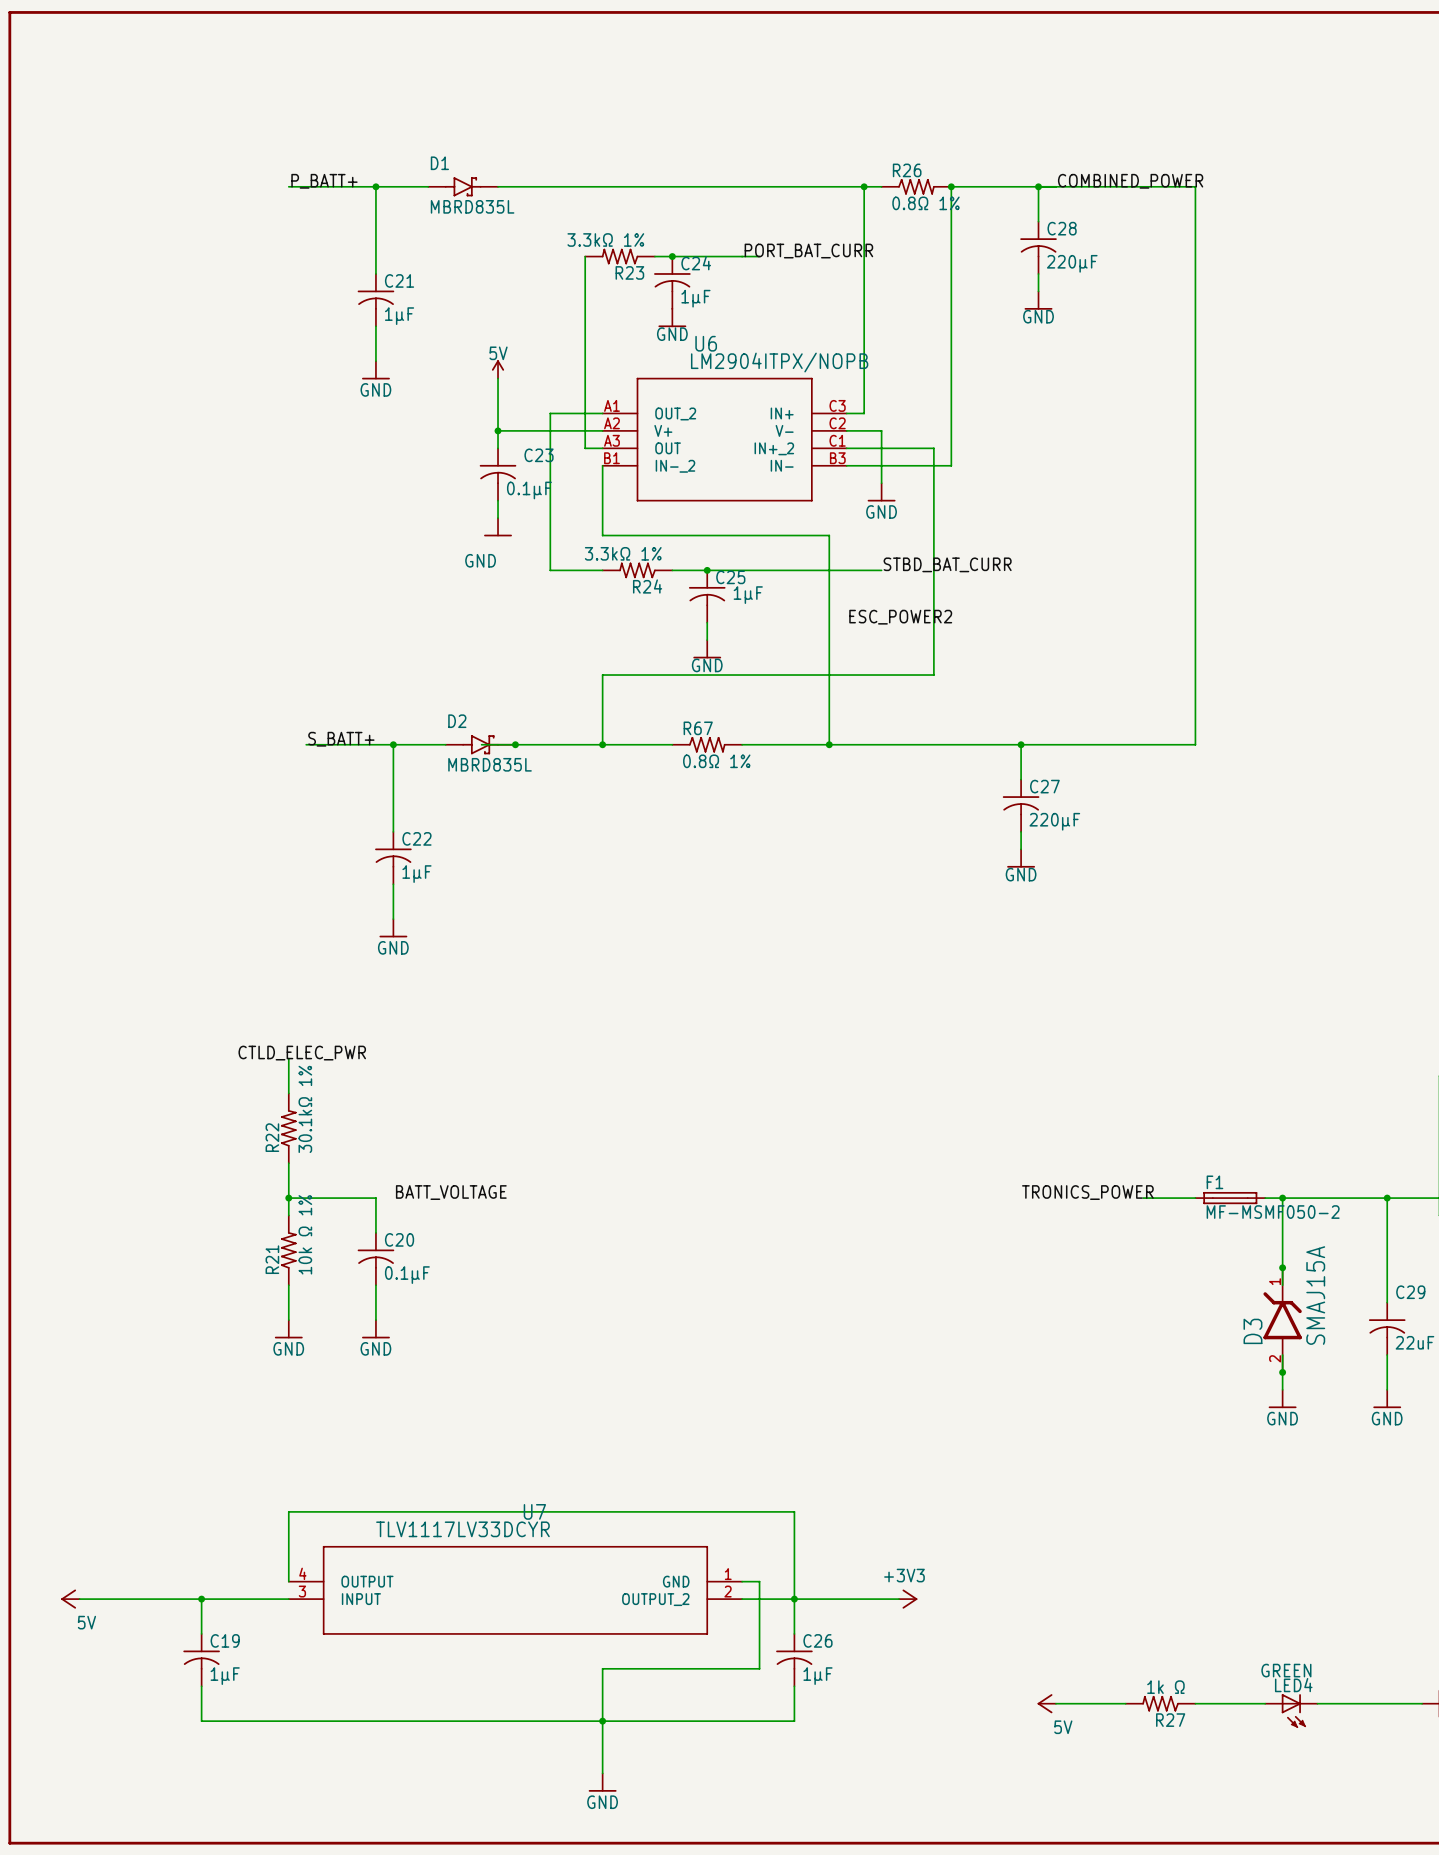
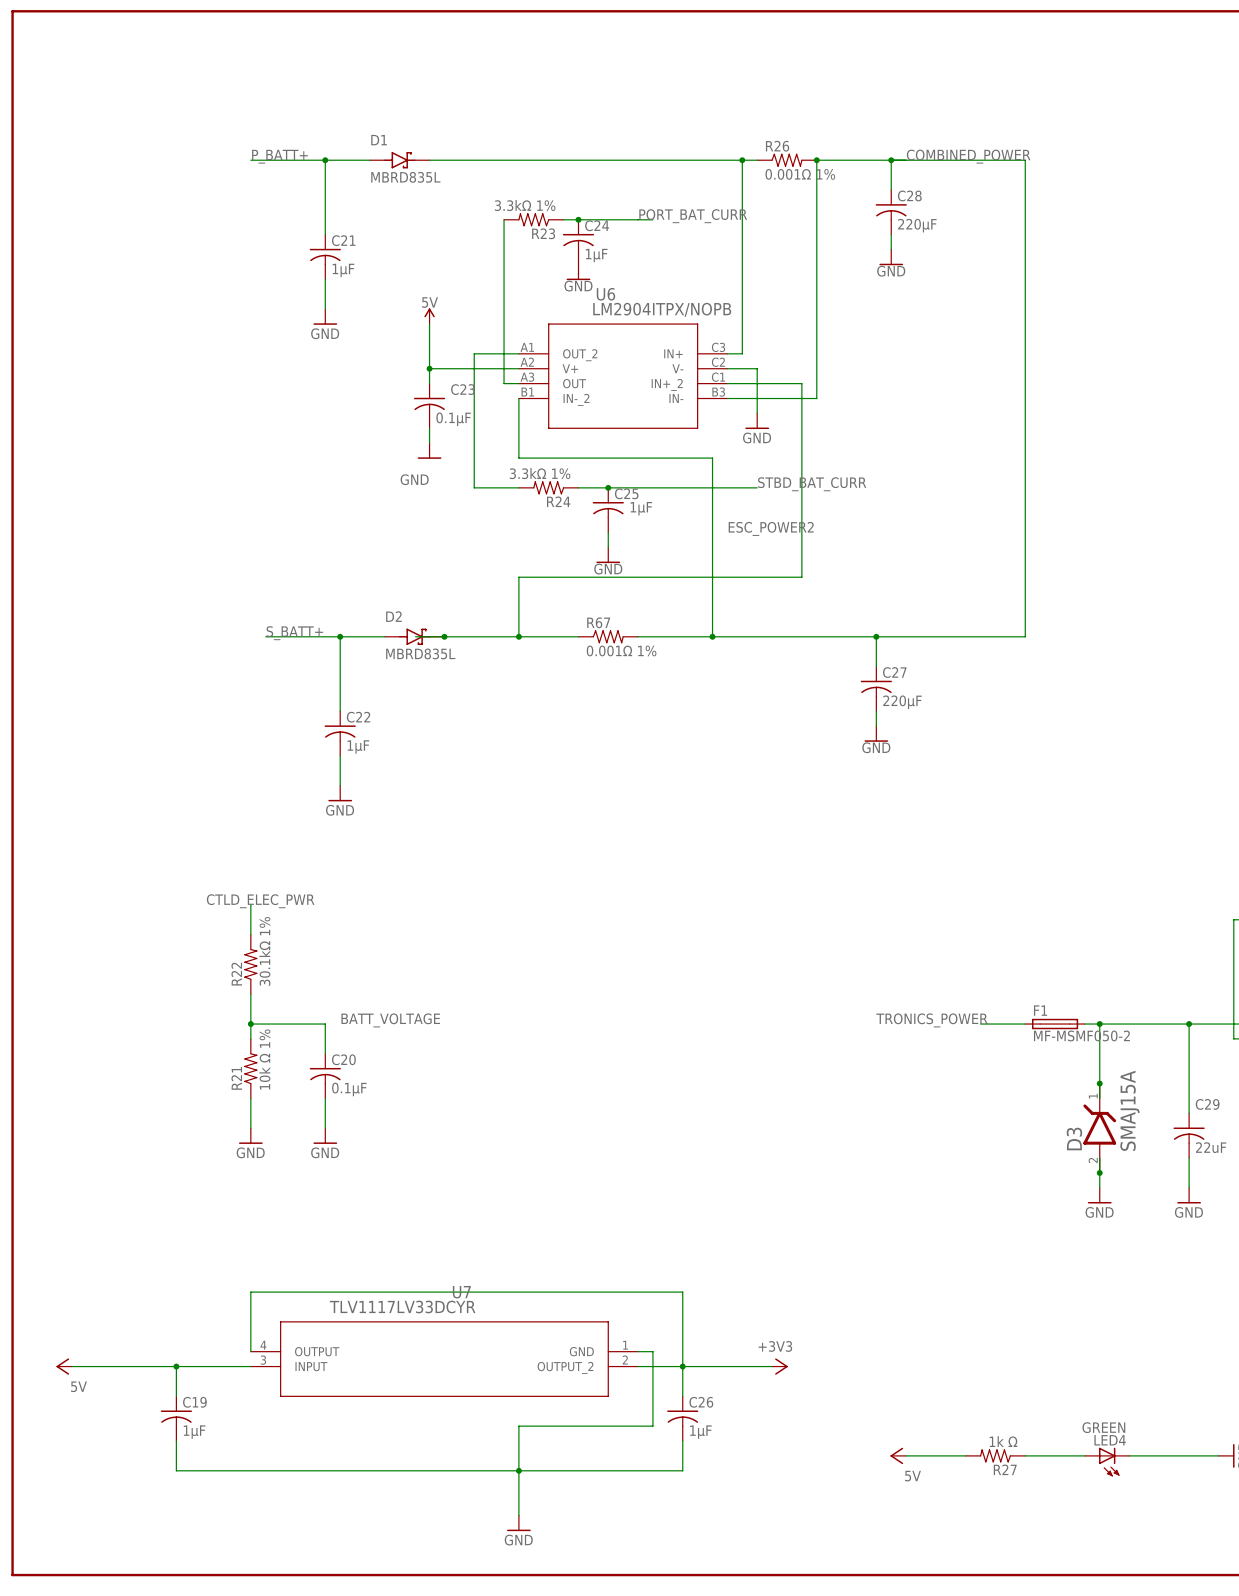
R26 value: 0.8Ω 1% (926, 203) -> 0.001Ω 1% (800, 174)
R67 value: 0.8Ω 1% (716, 761) -> 0.001Ω 1% (621, 650)

